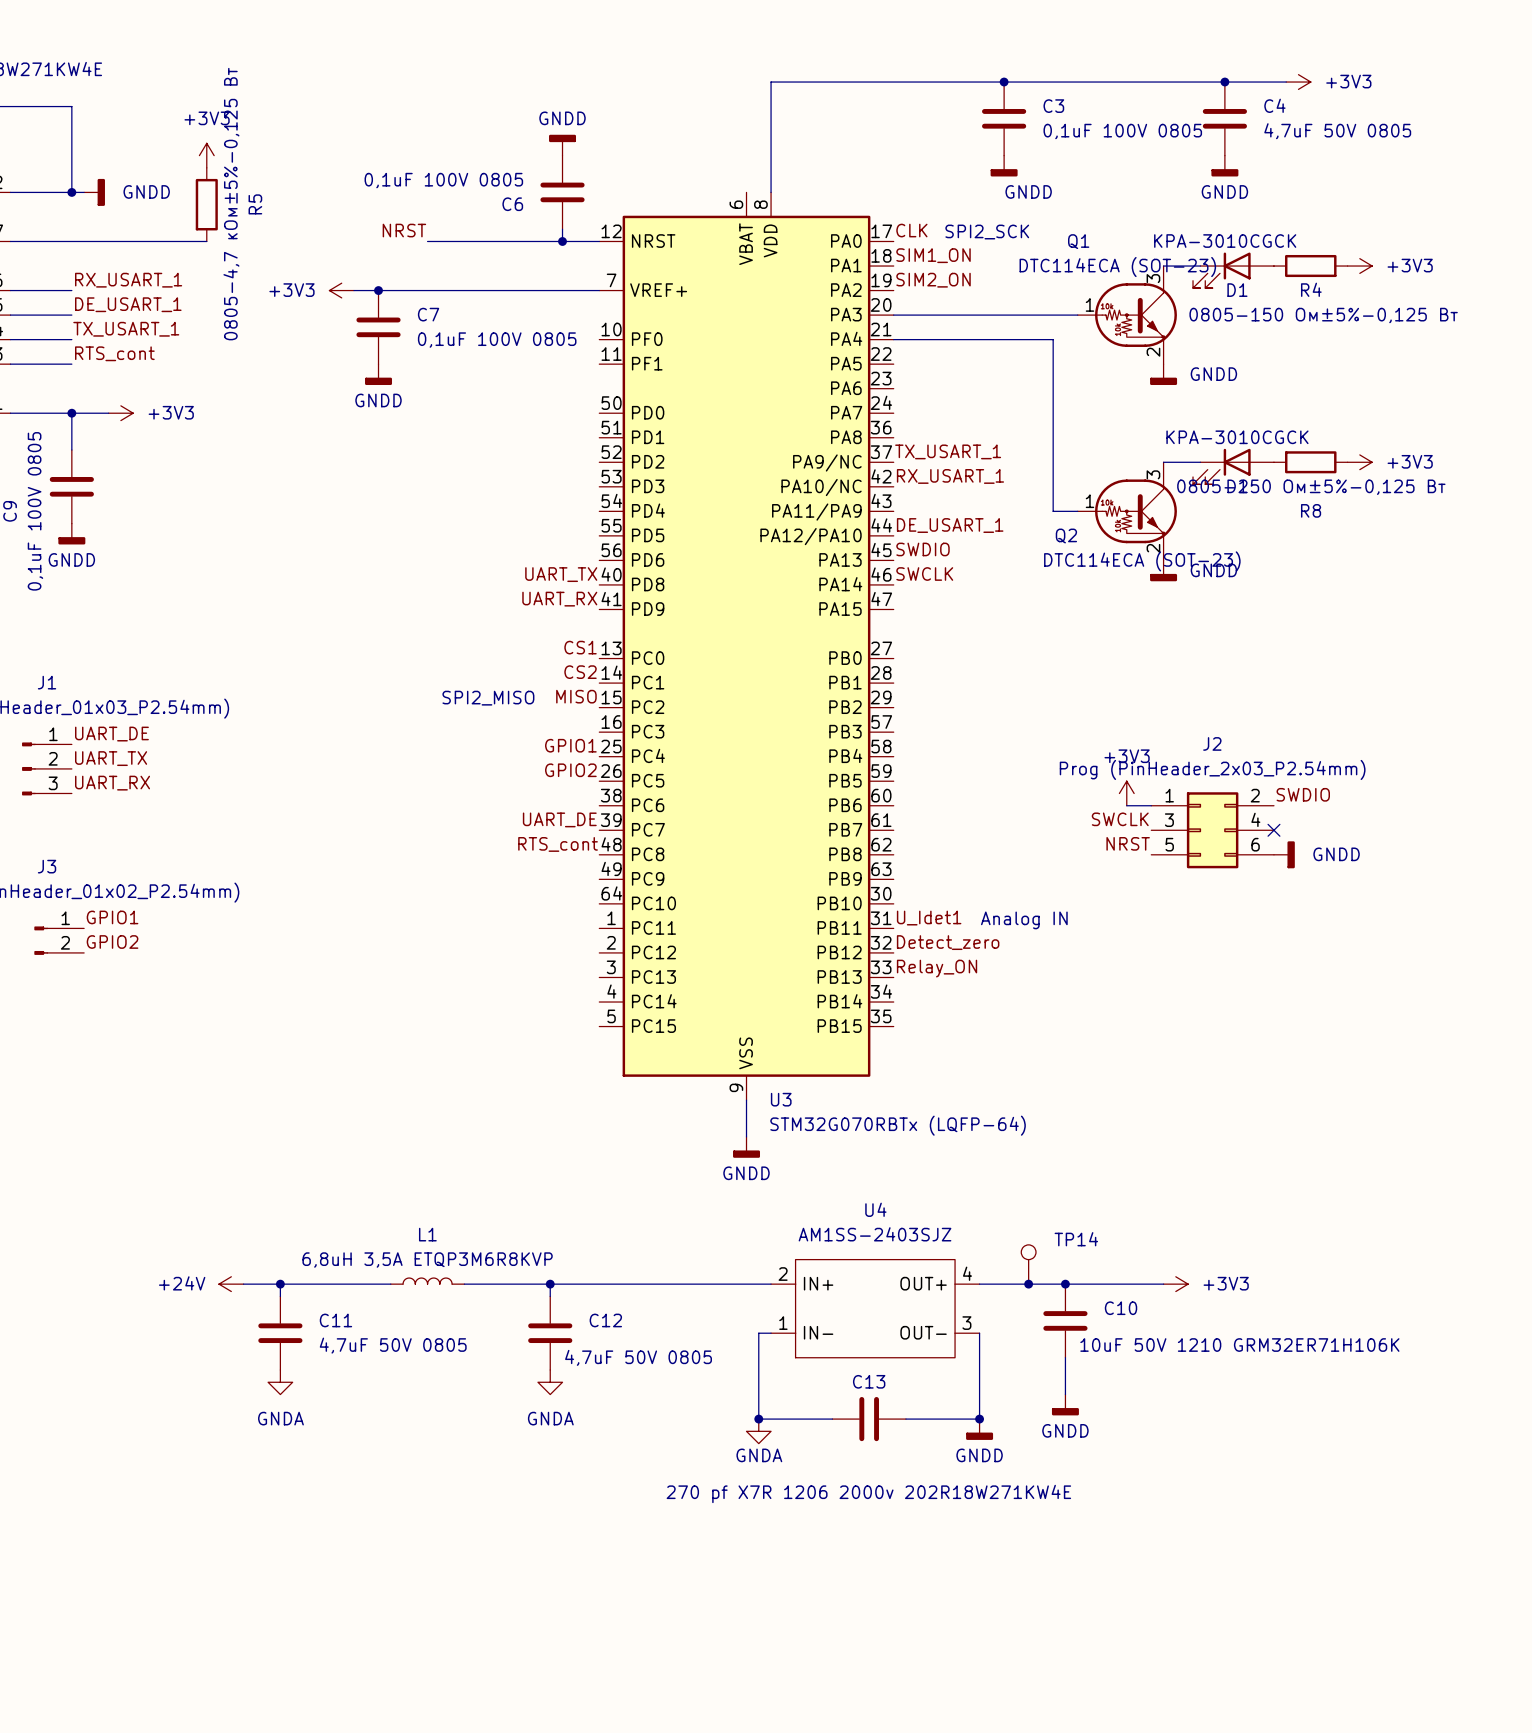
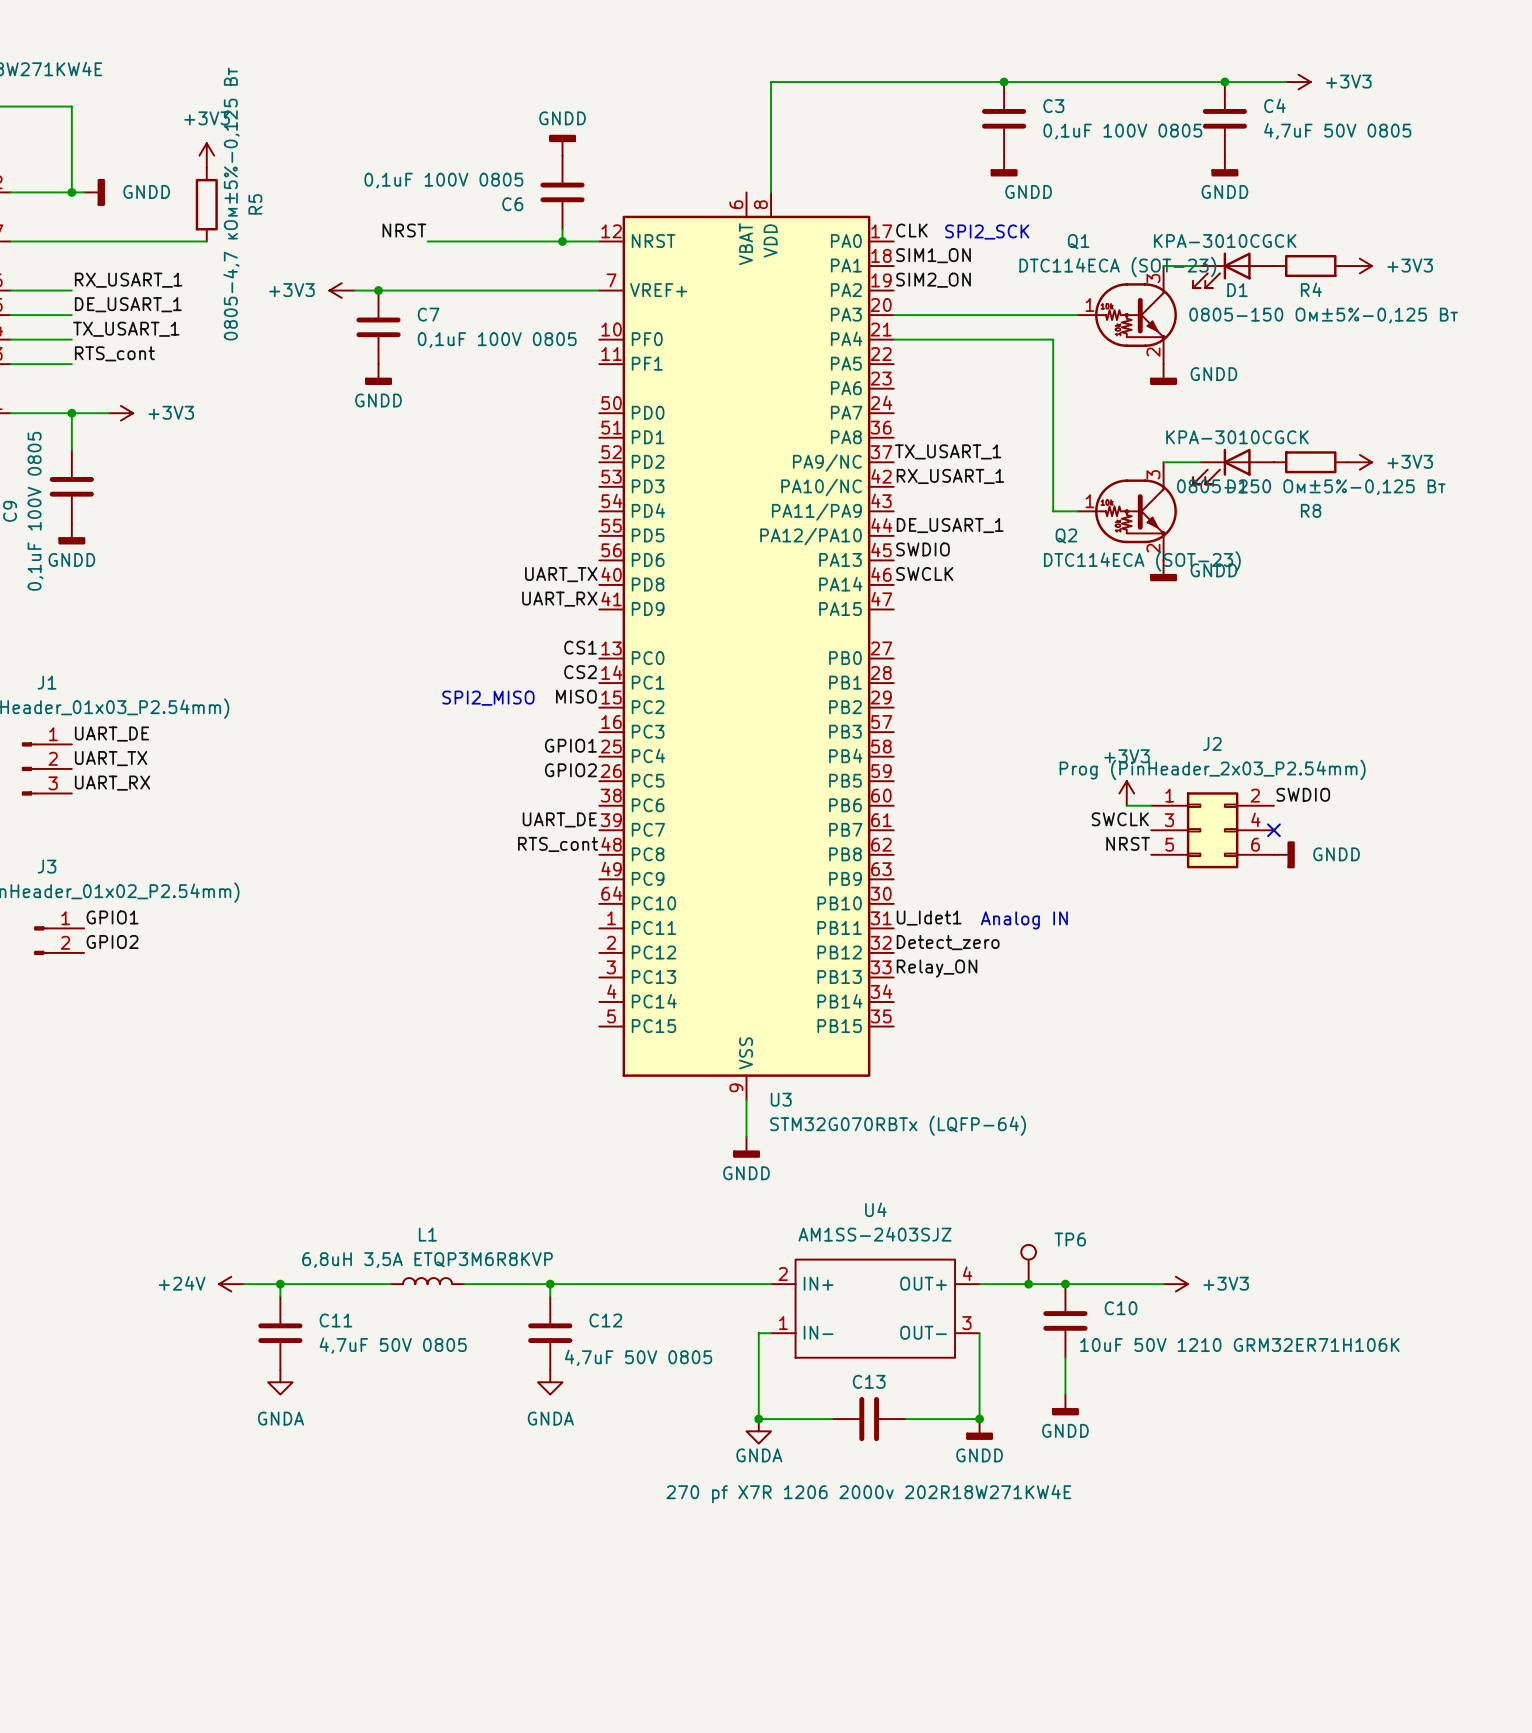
TP14 name: TP14 (1076, 1239) -> TP6 (1070, 1239)

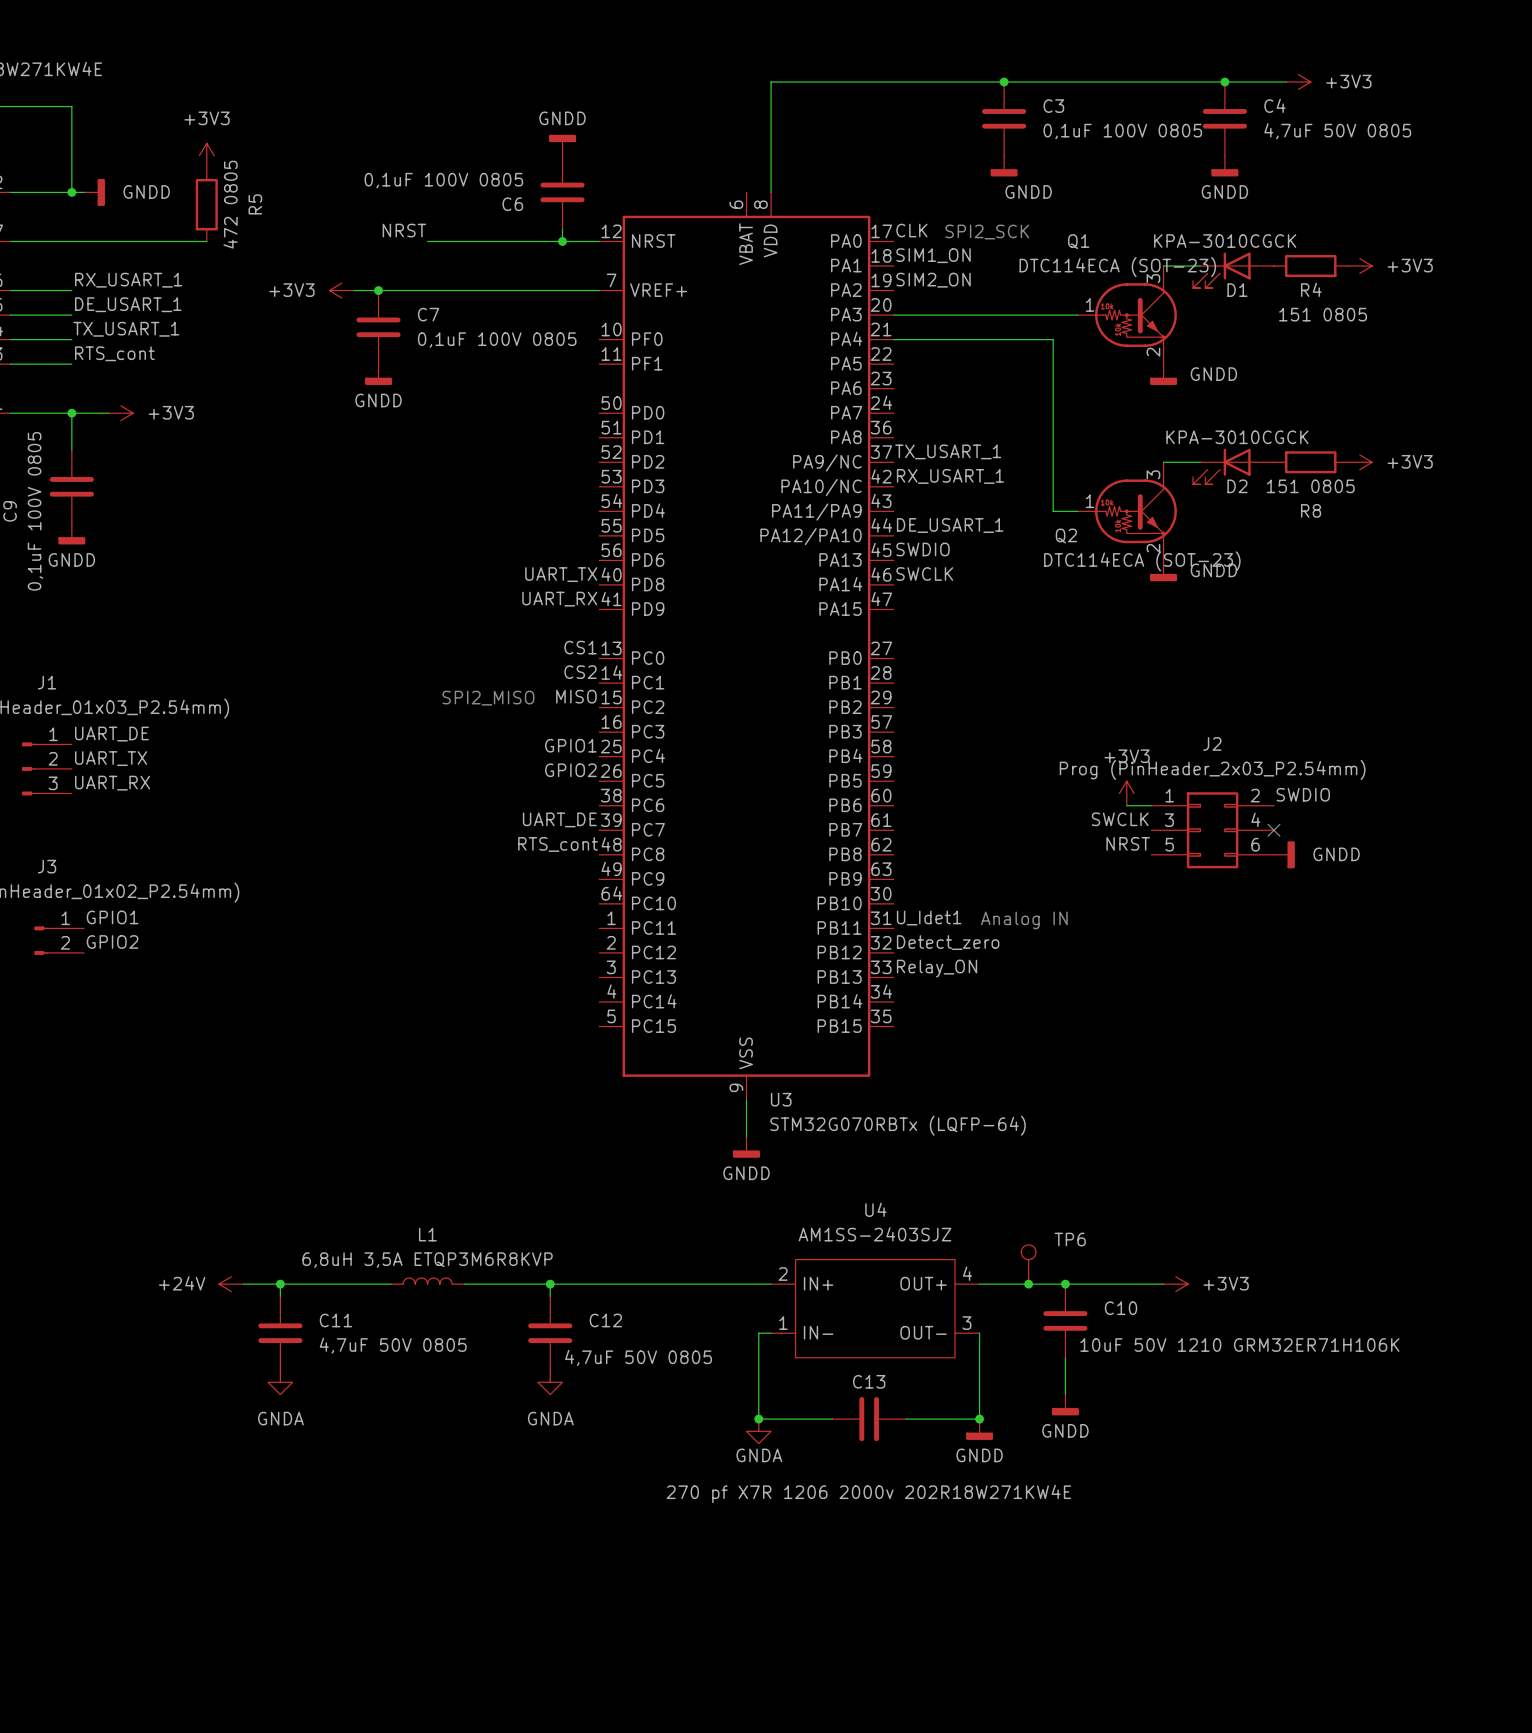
R5 value: 0805-4,7 кОм±5%-0,125 Вт (231, 204) -> 472 0805 (230, 204)
R4 value: 0805-150 Ом±5%-0,125 Вт (1323, 315) -> 151 0805 (1323, 314)
R8 value: 0805-150 Ом±5%-0,125 Вт (1311, 487) -> 151 0805 (1310, 486)

